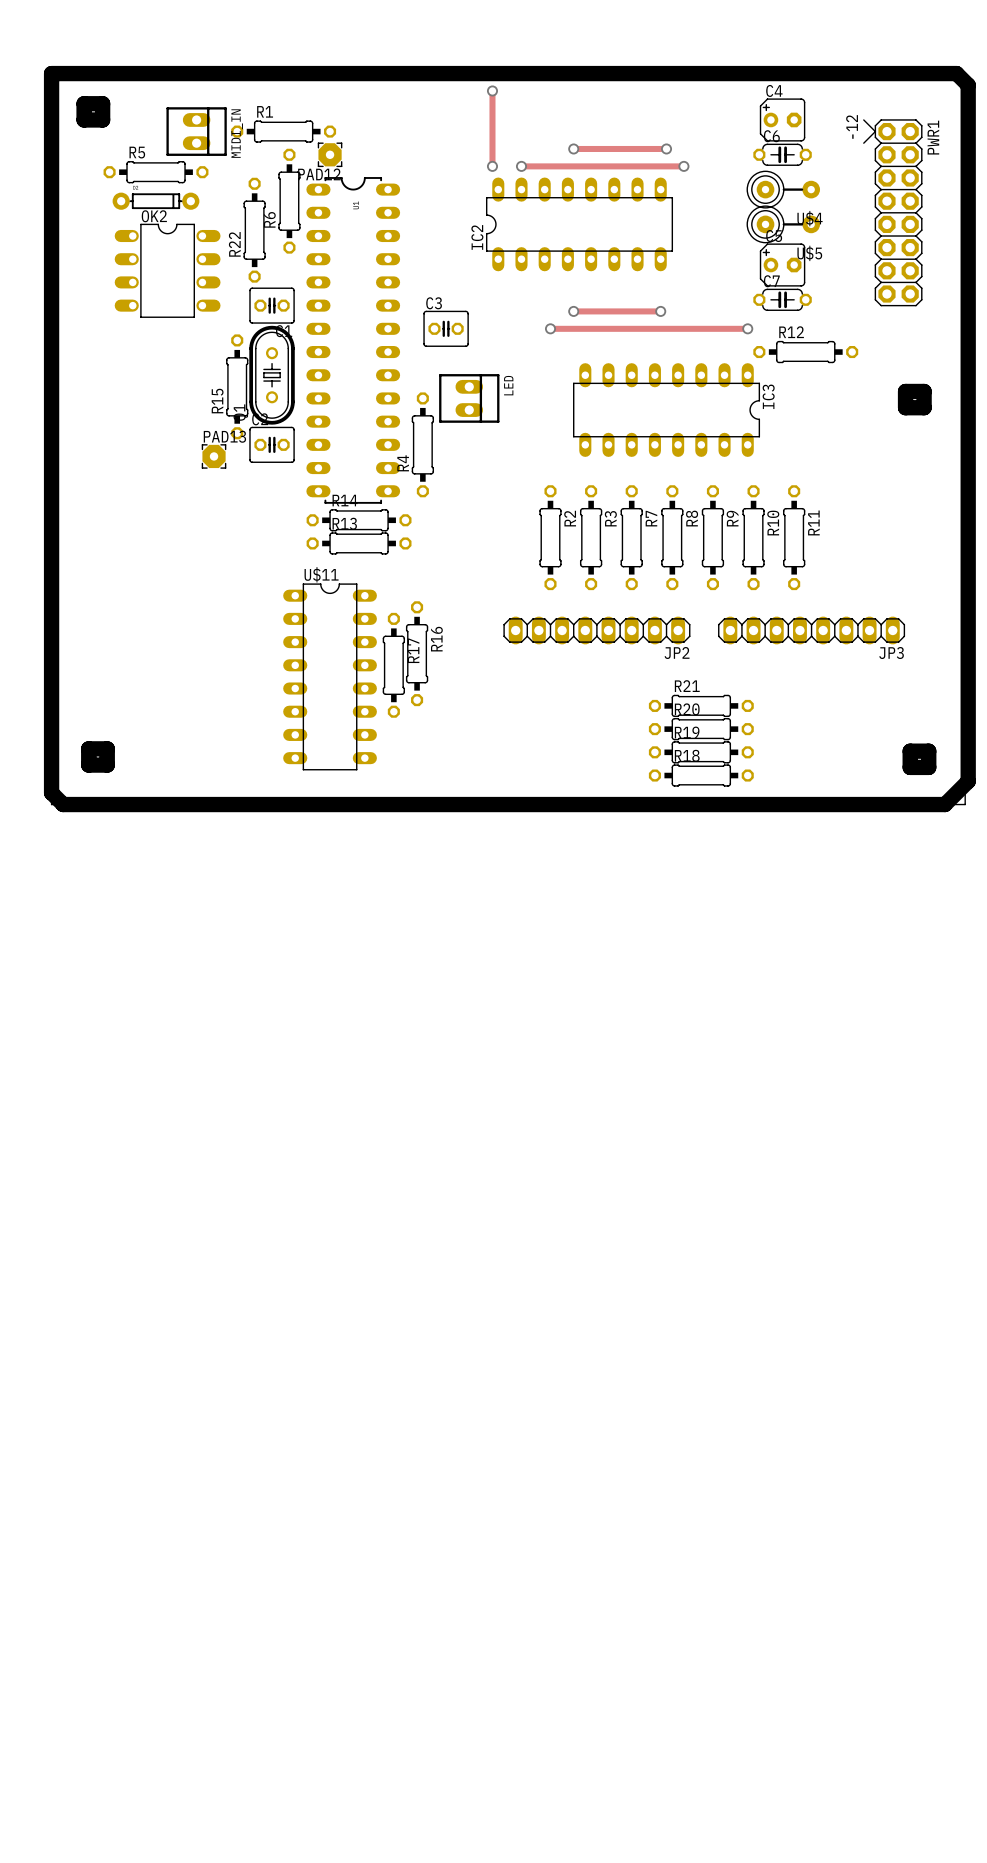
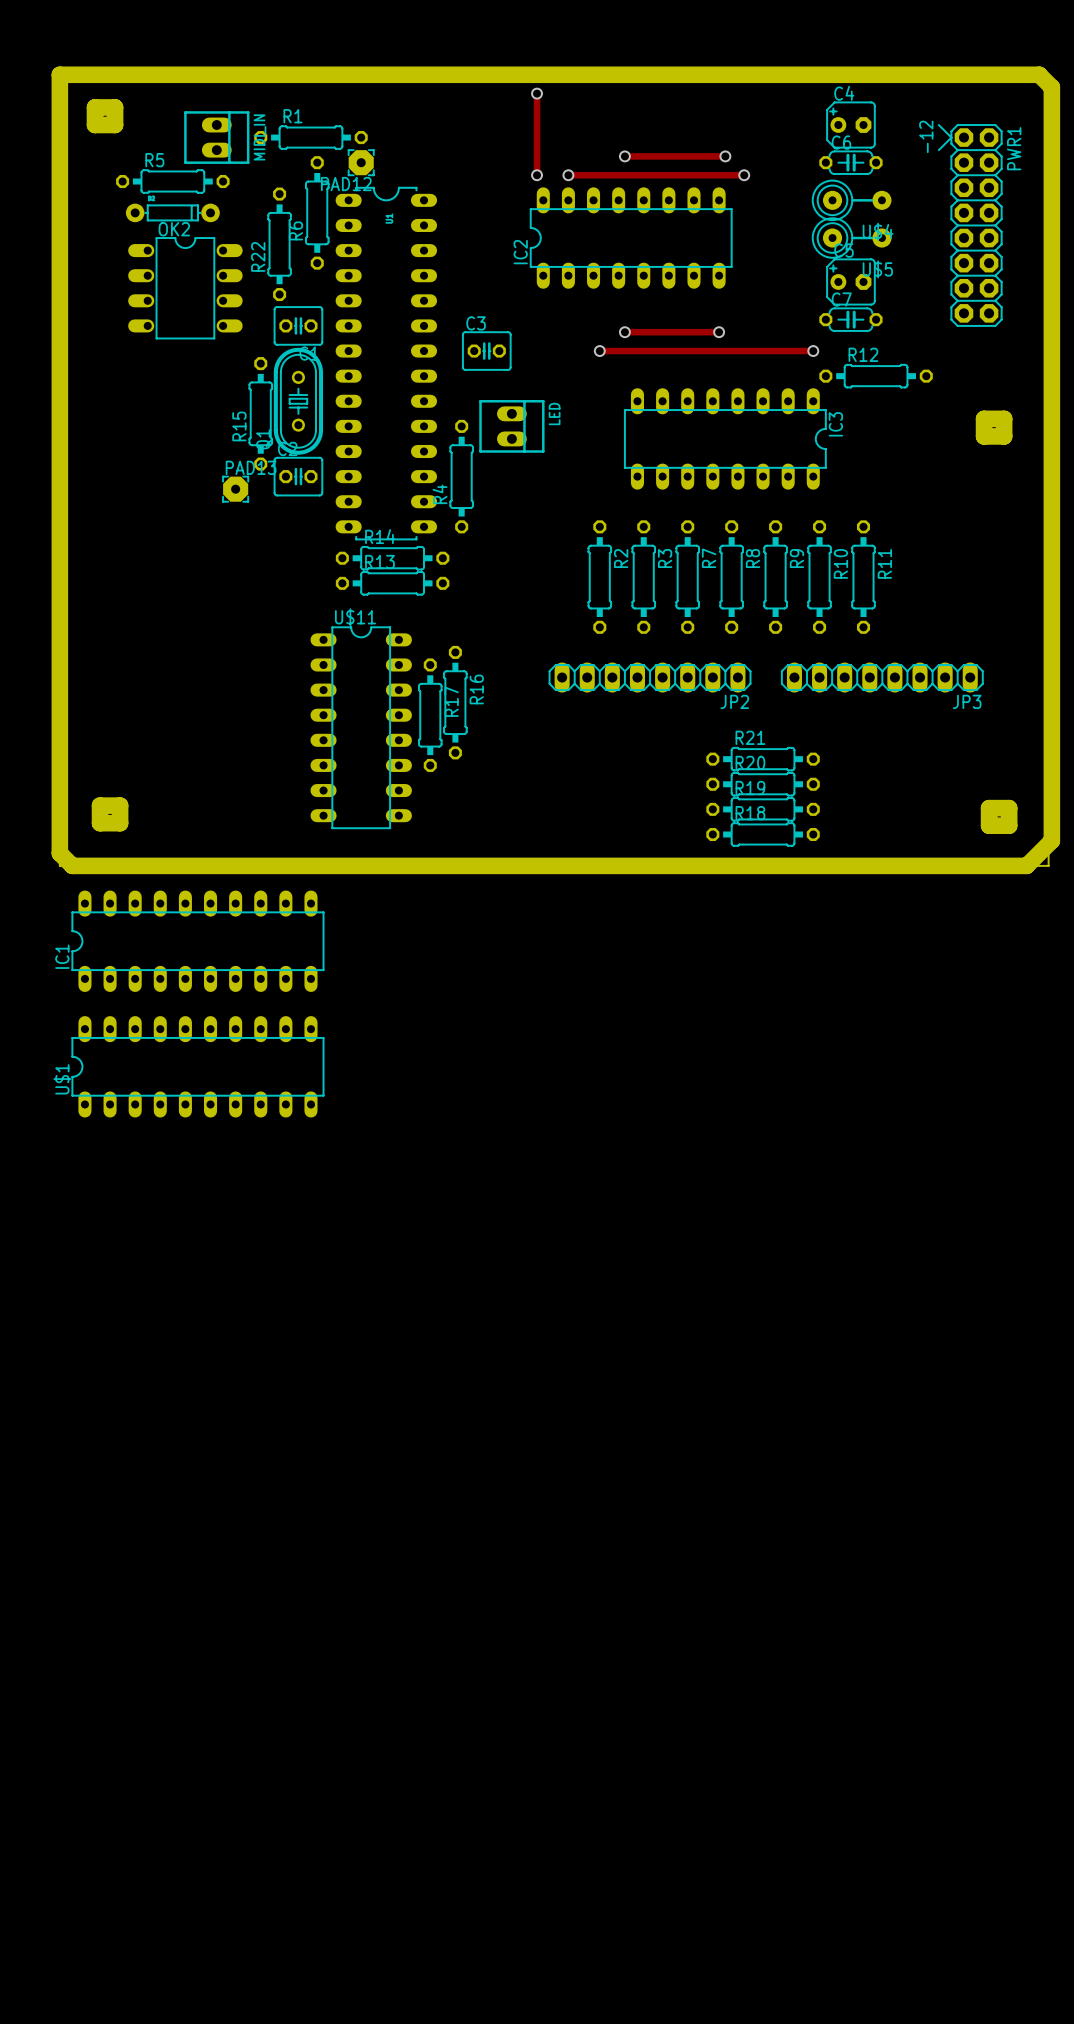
IC1: none -> (197, 941)
U$1: none -> (197, 1066)

